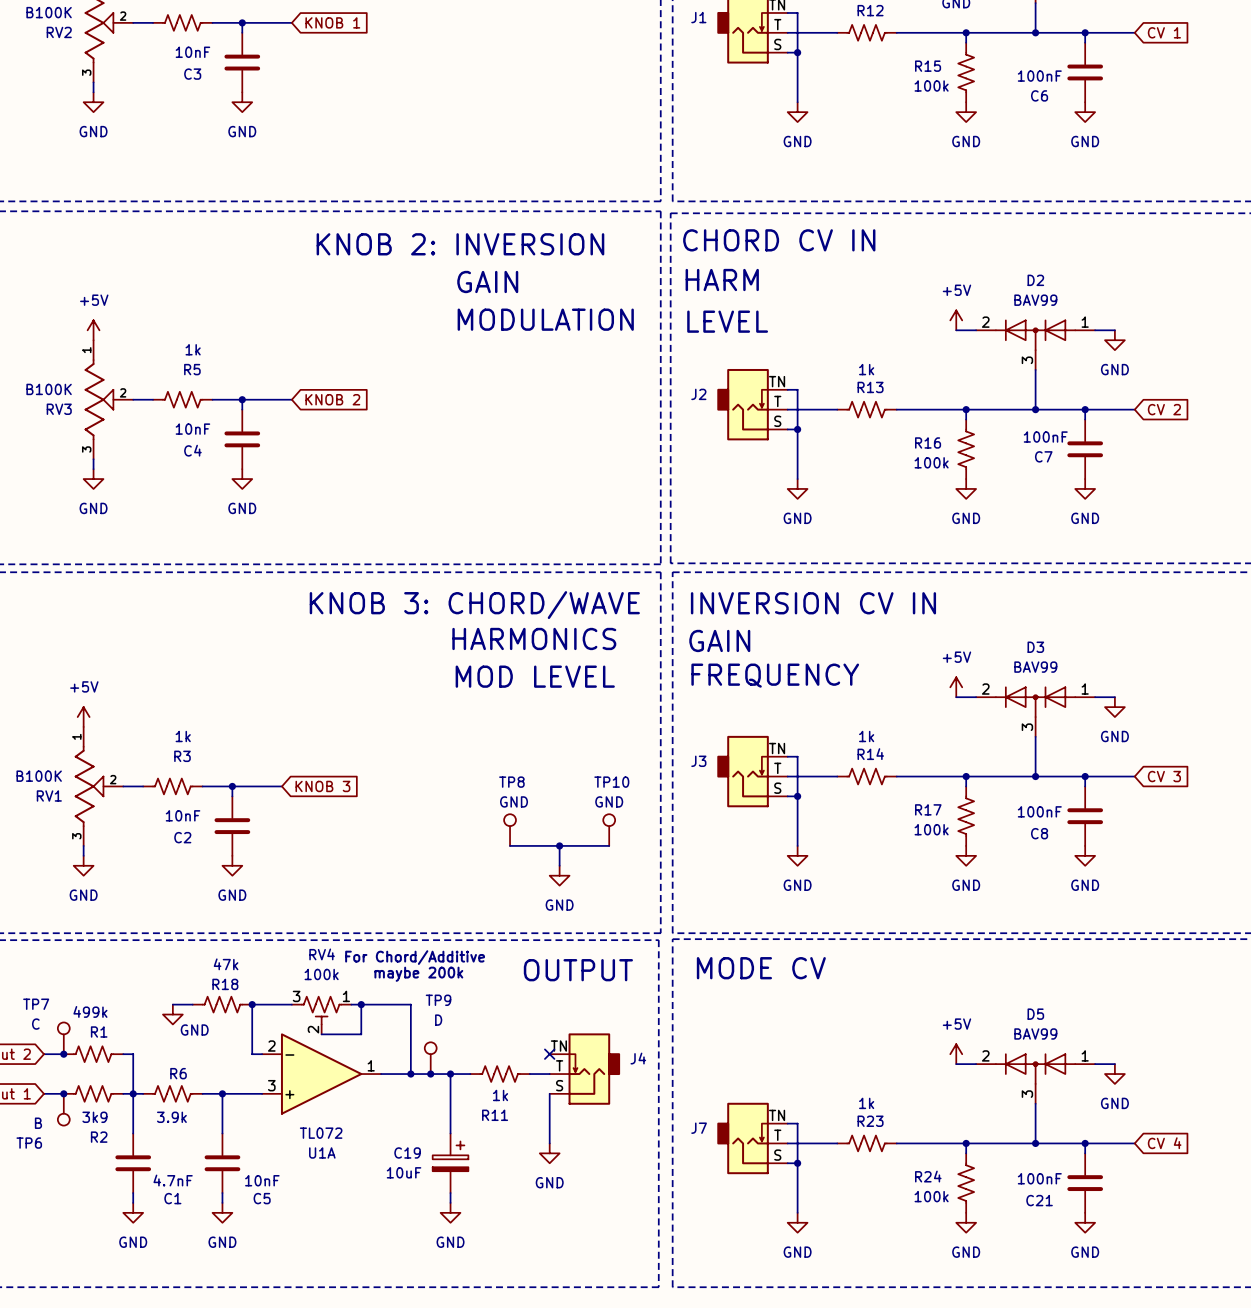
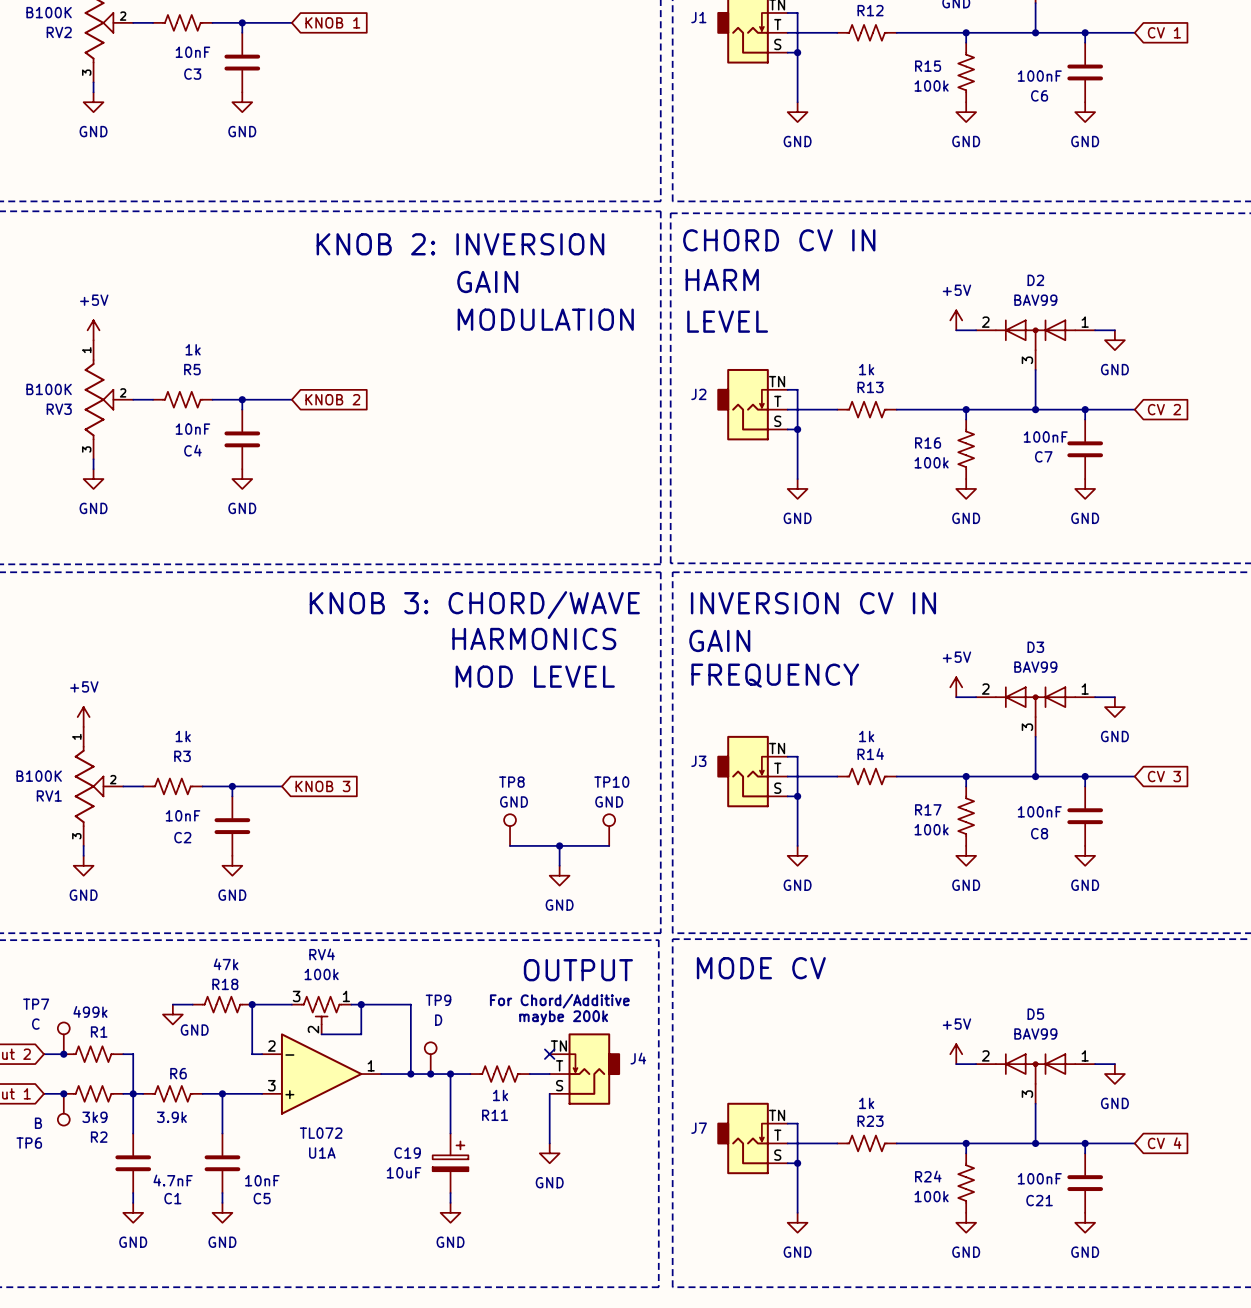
text position: For Chord/Additive (415, 957) -> For Chord/Additive (559, 1001)
text position: maybe 200k (418, 974) -> maybe 200k (563, 1017)

